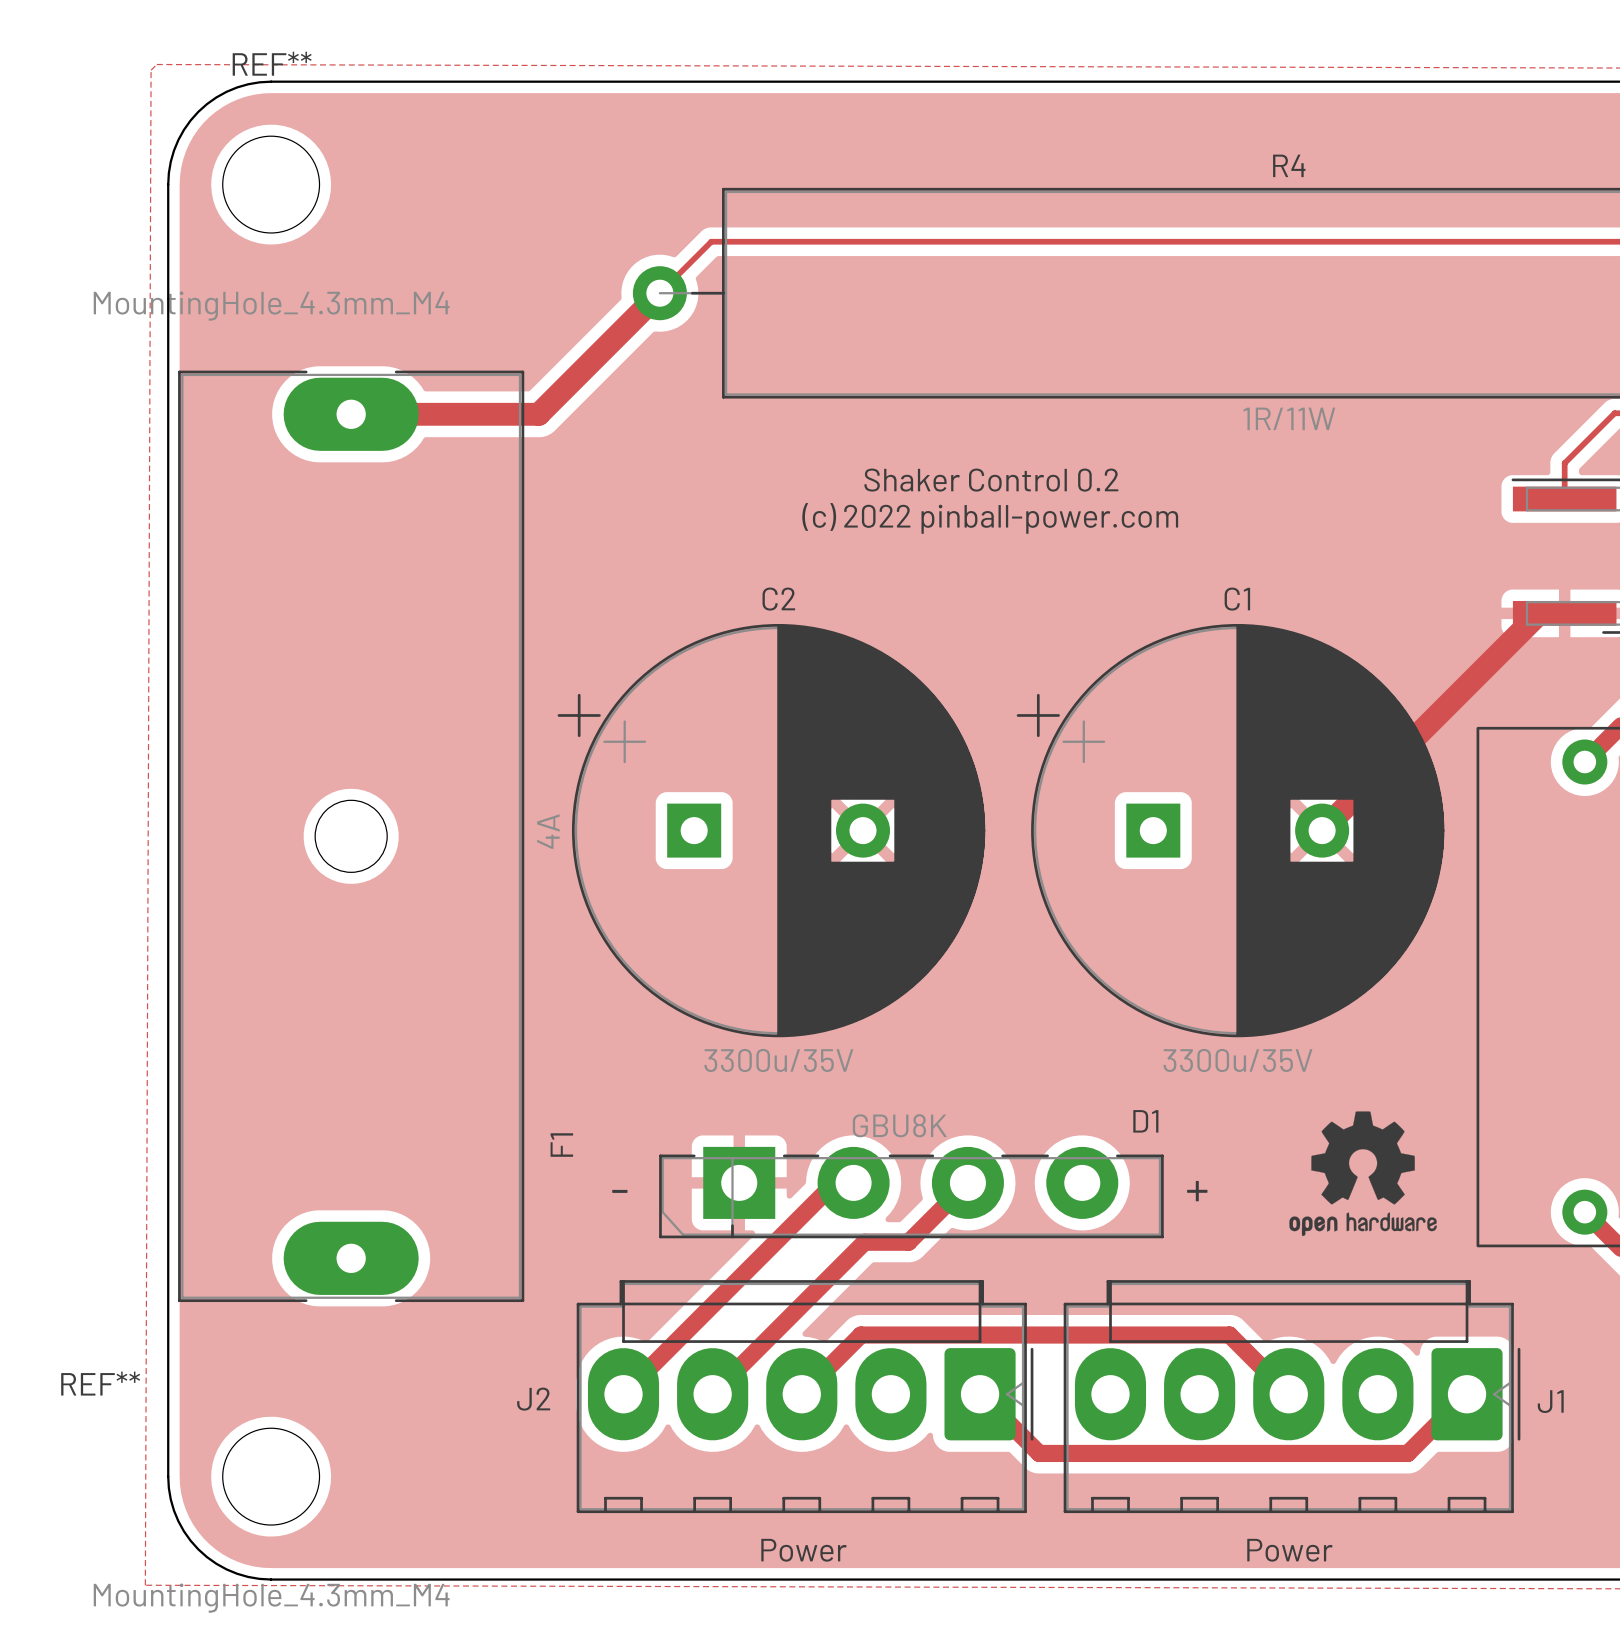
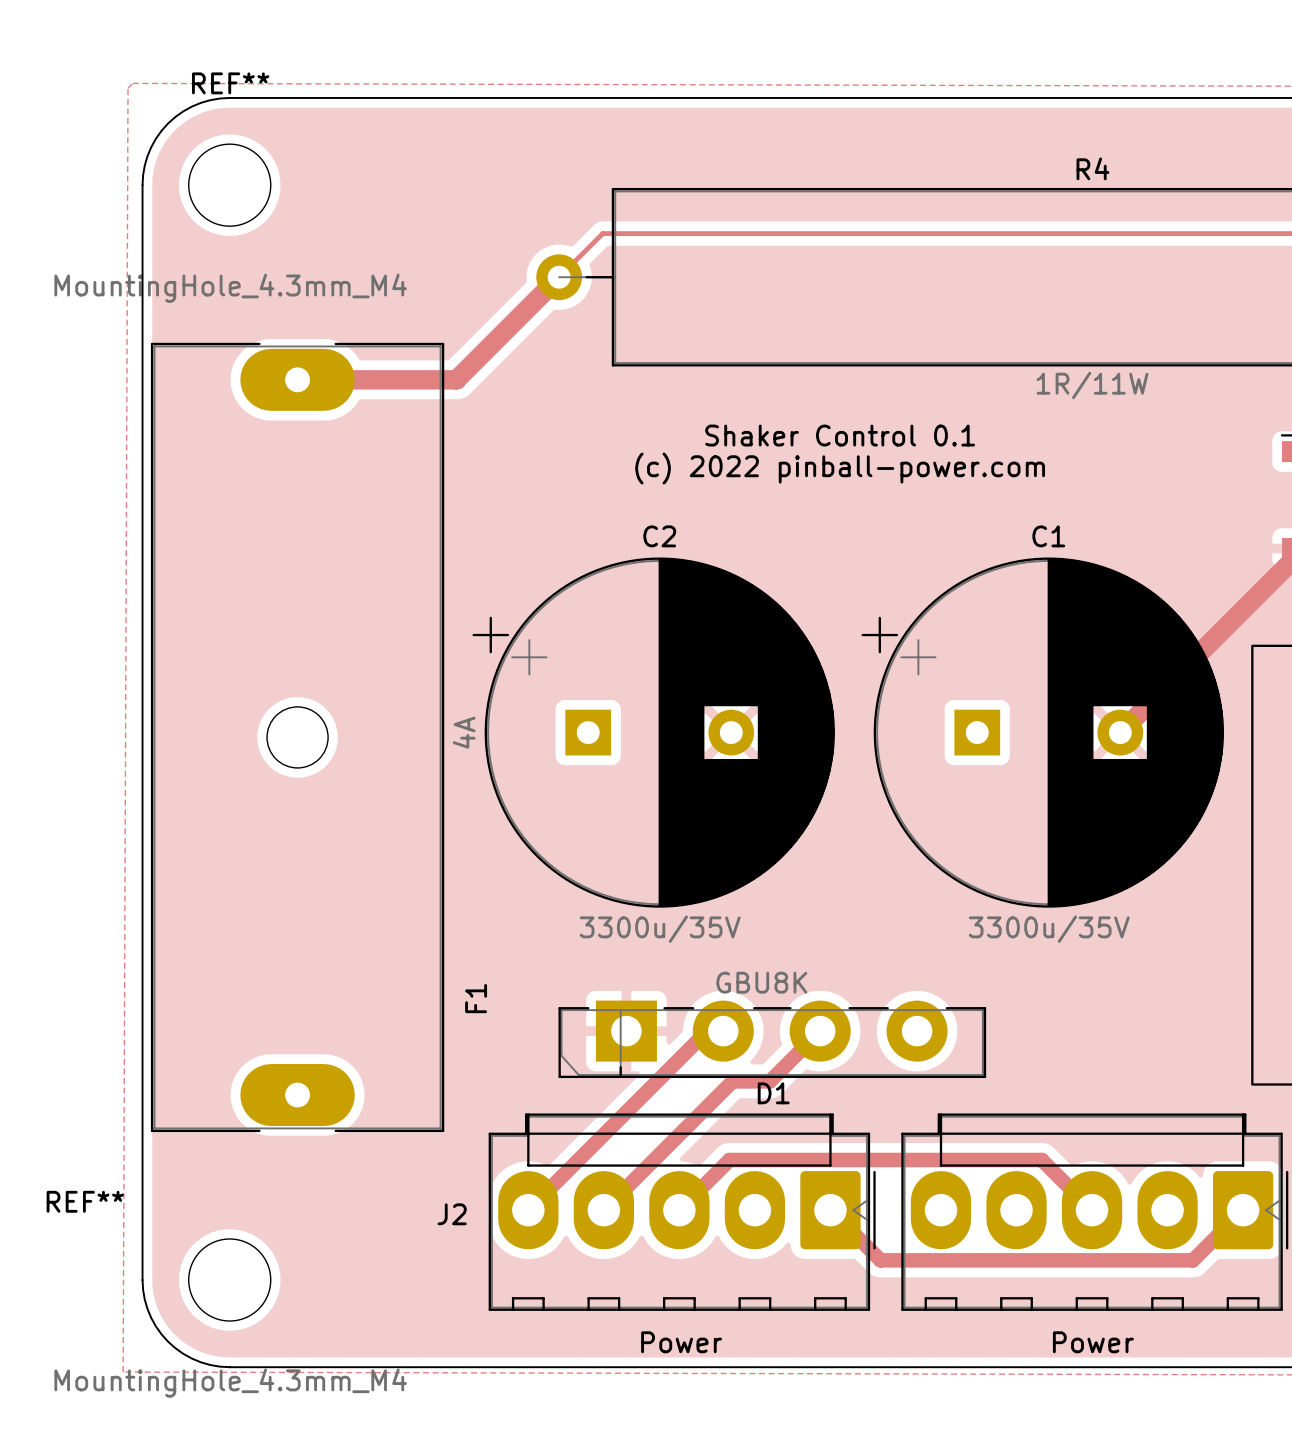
text: Shaker Control 0.2 (991, 480) -> Shaker Control 0.1 (840, 435)
drawing: [1289, 1111, 1437, 1237] -> none
D1 name position: D1 (1145, 1121) -> D1 (773, 1093)
text: - (619, 1191) -> none
text: + (1197, 1191) -> none

